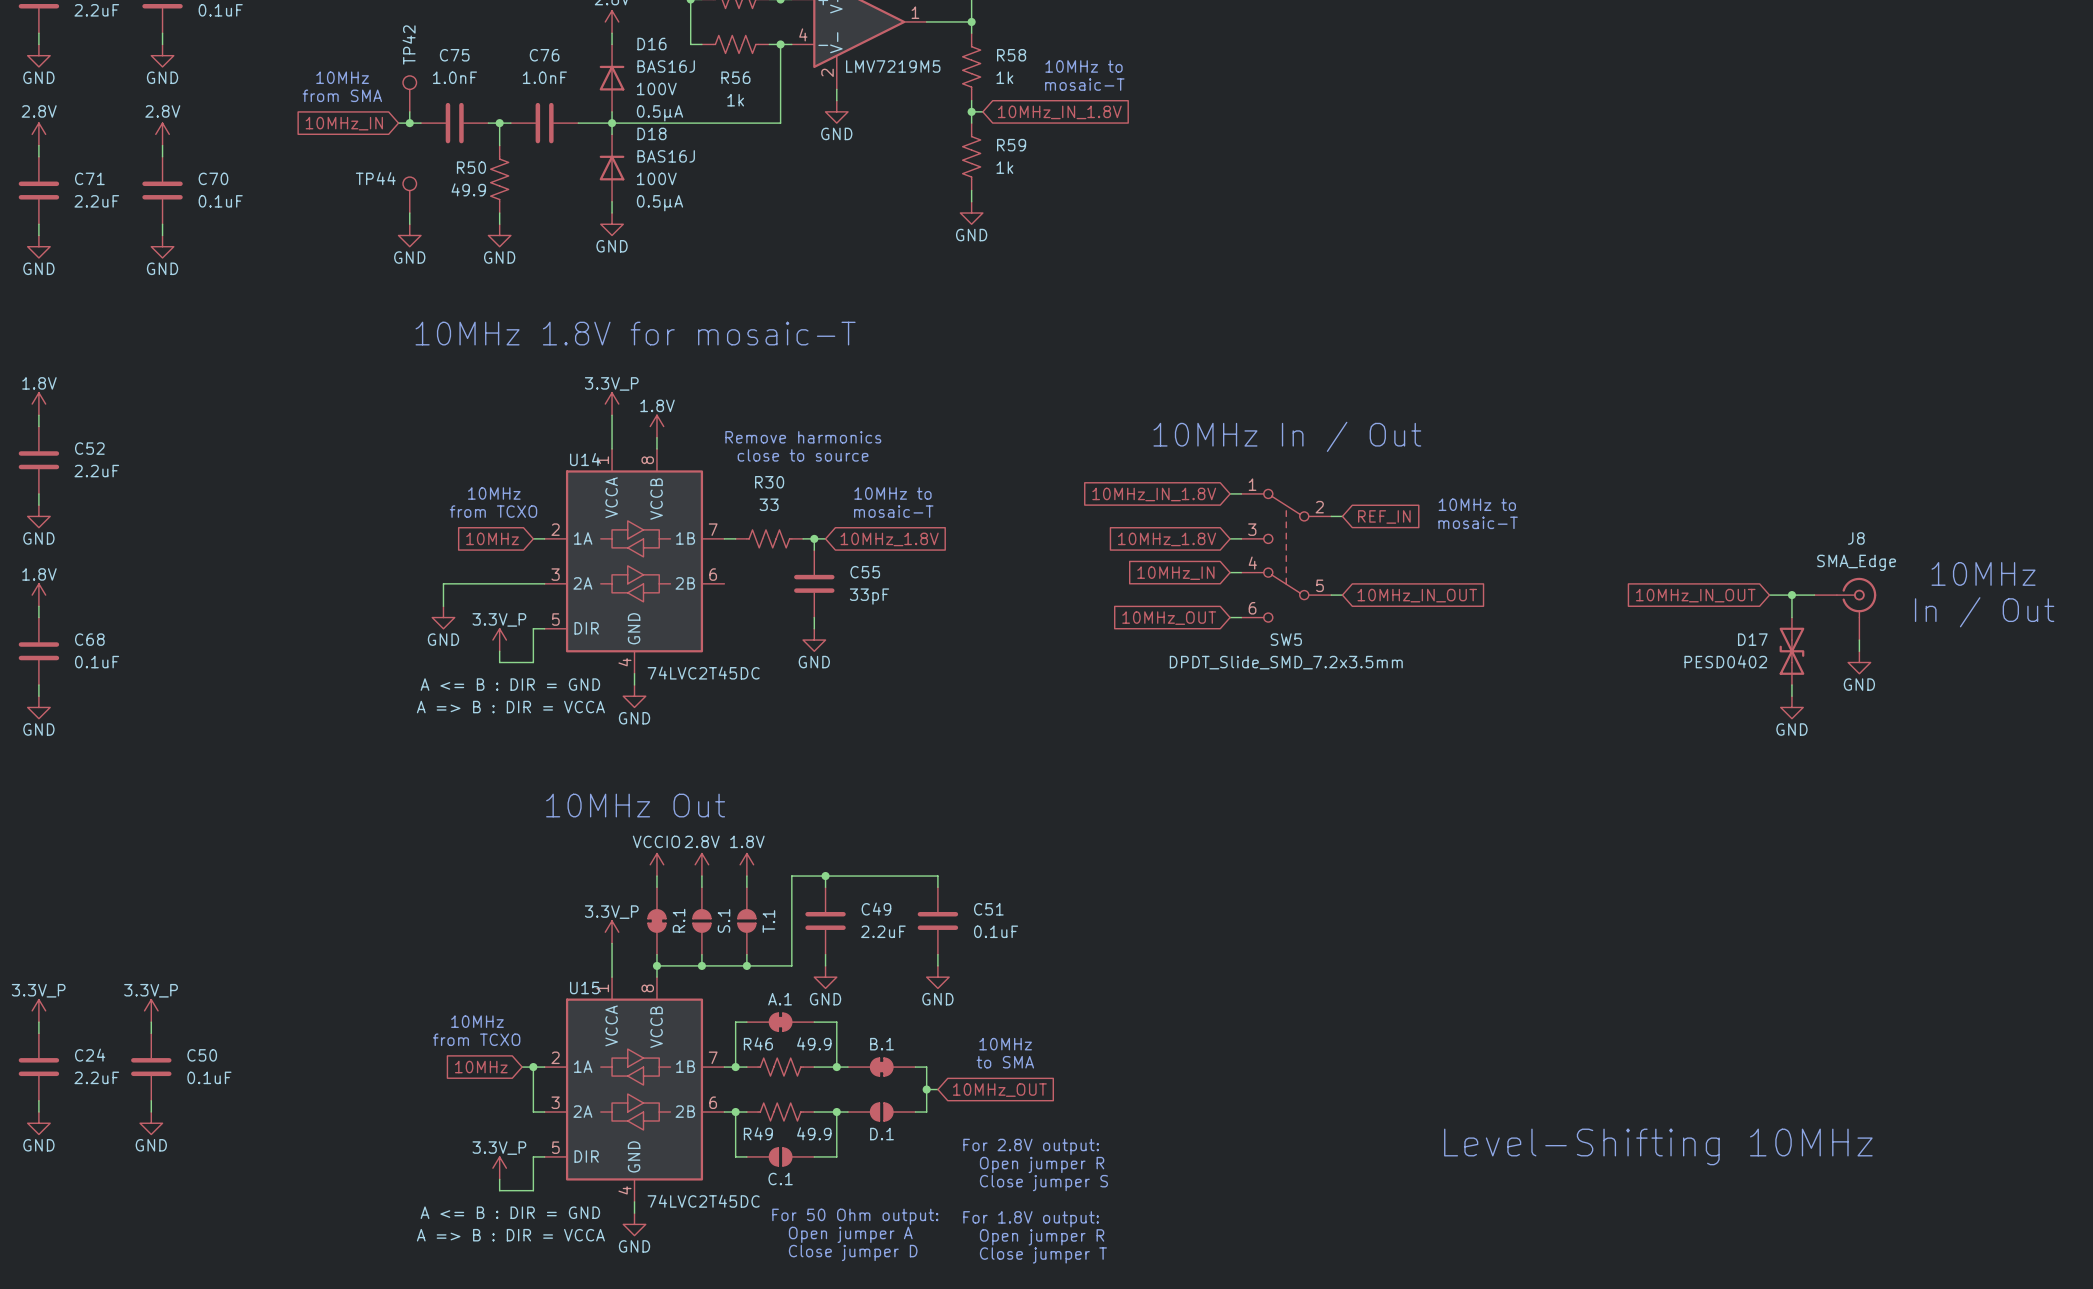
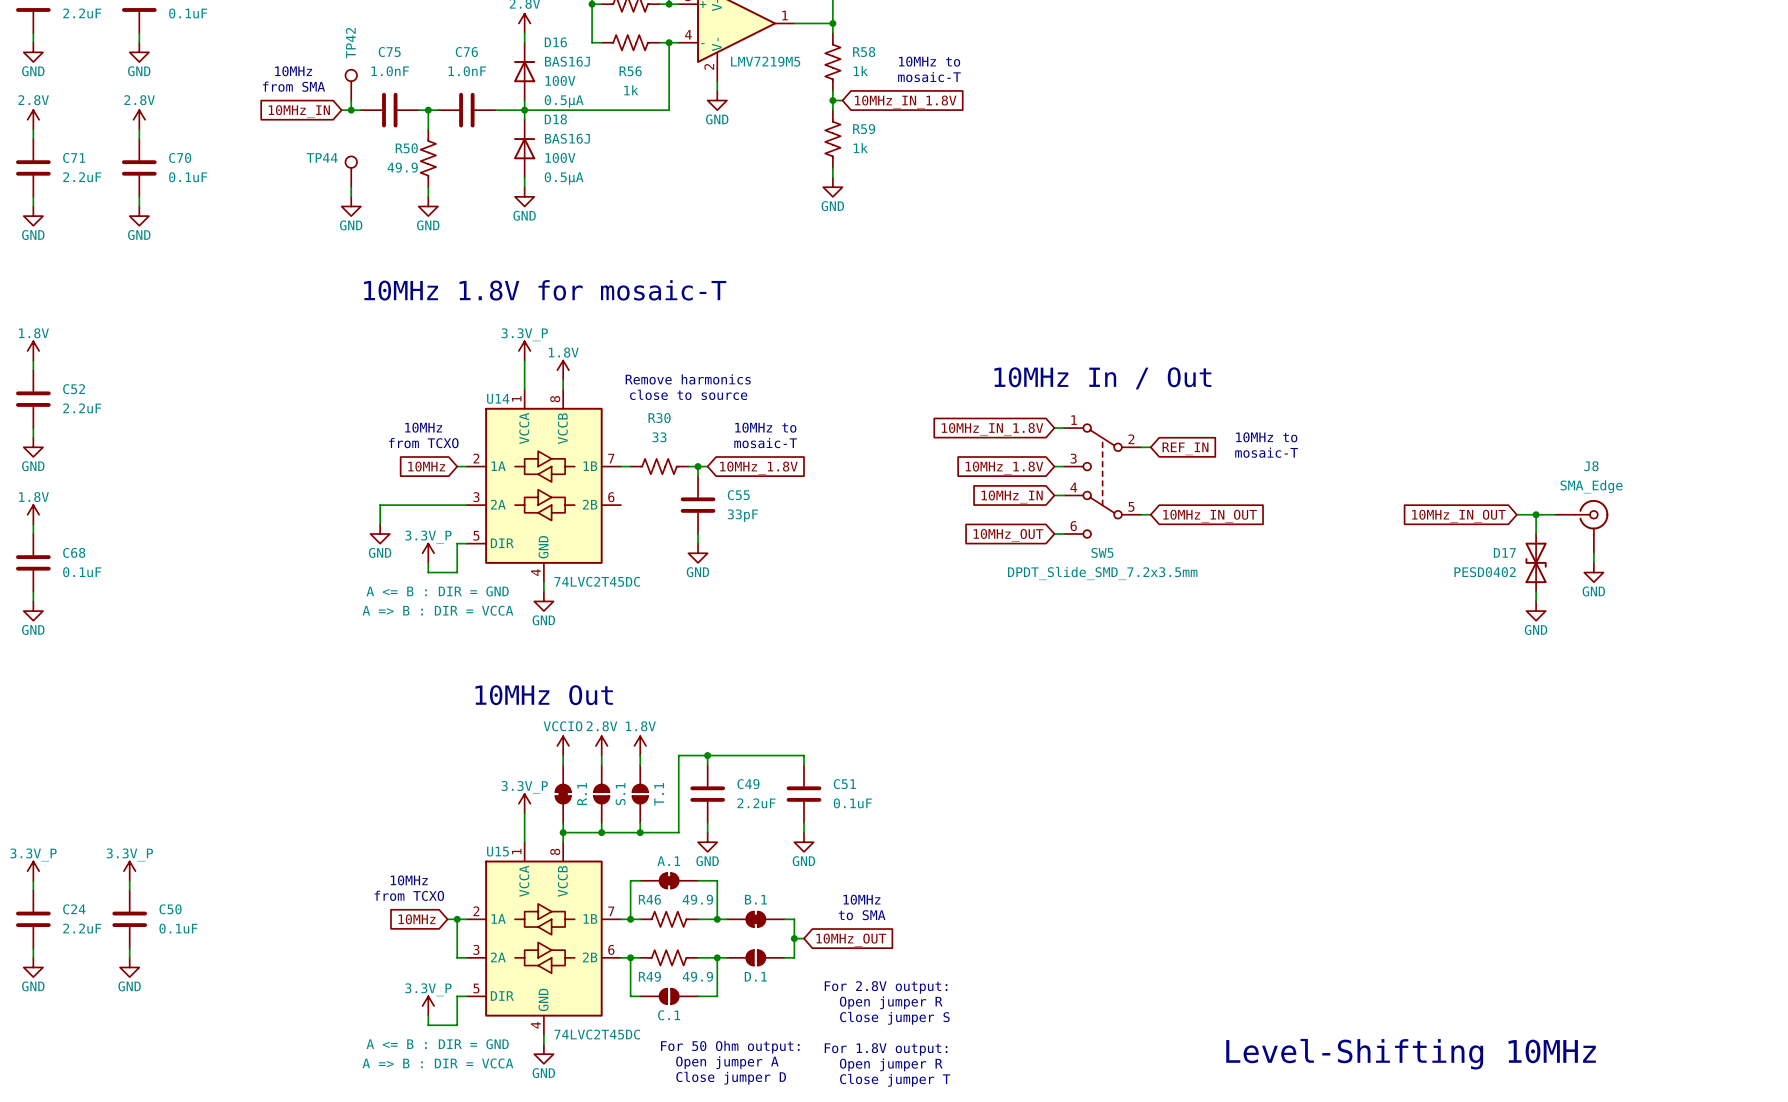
text: 10MHz (1983, 573) -> none
text: In / Out (1984, 612) -> none
text position: Level-Shifting 10MHz (1658, 1146) -> Level-Shifting 10MHz (1411, 1054)

